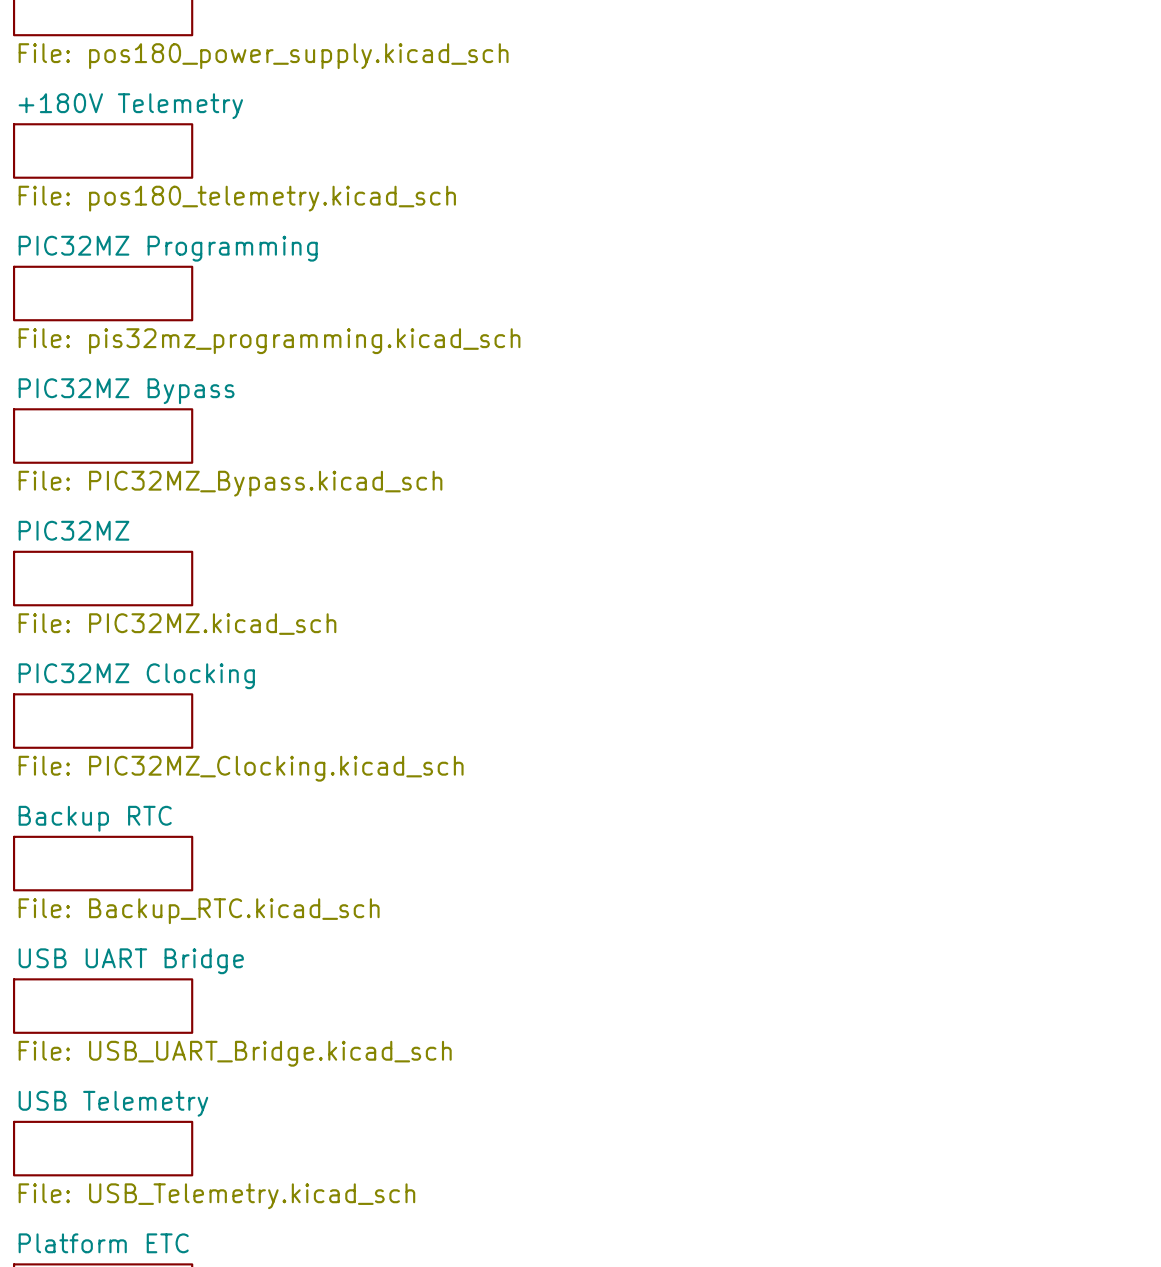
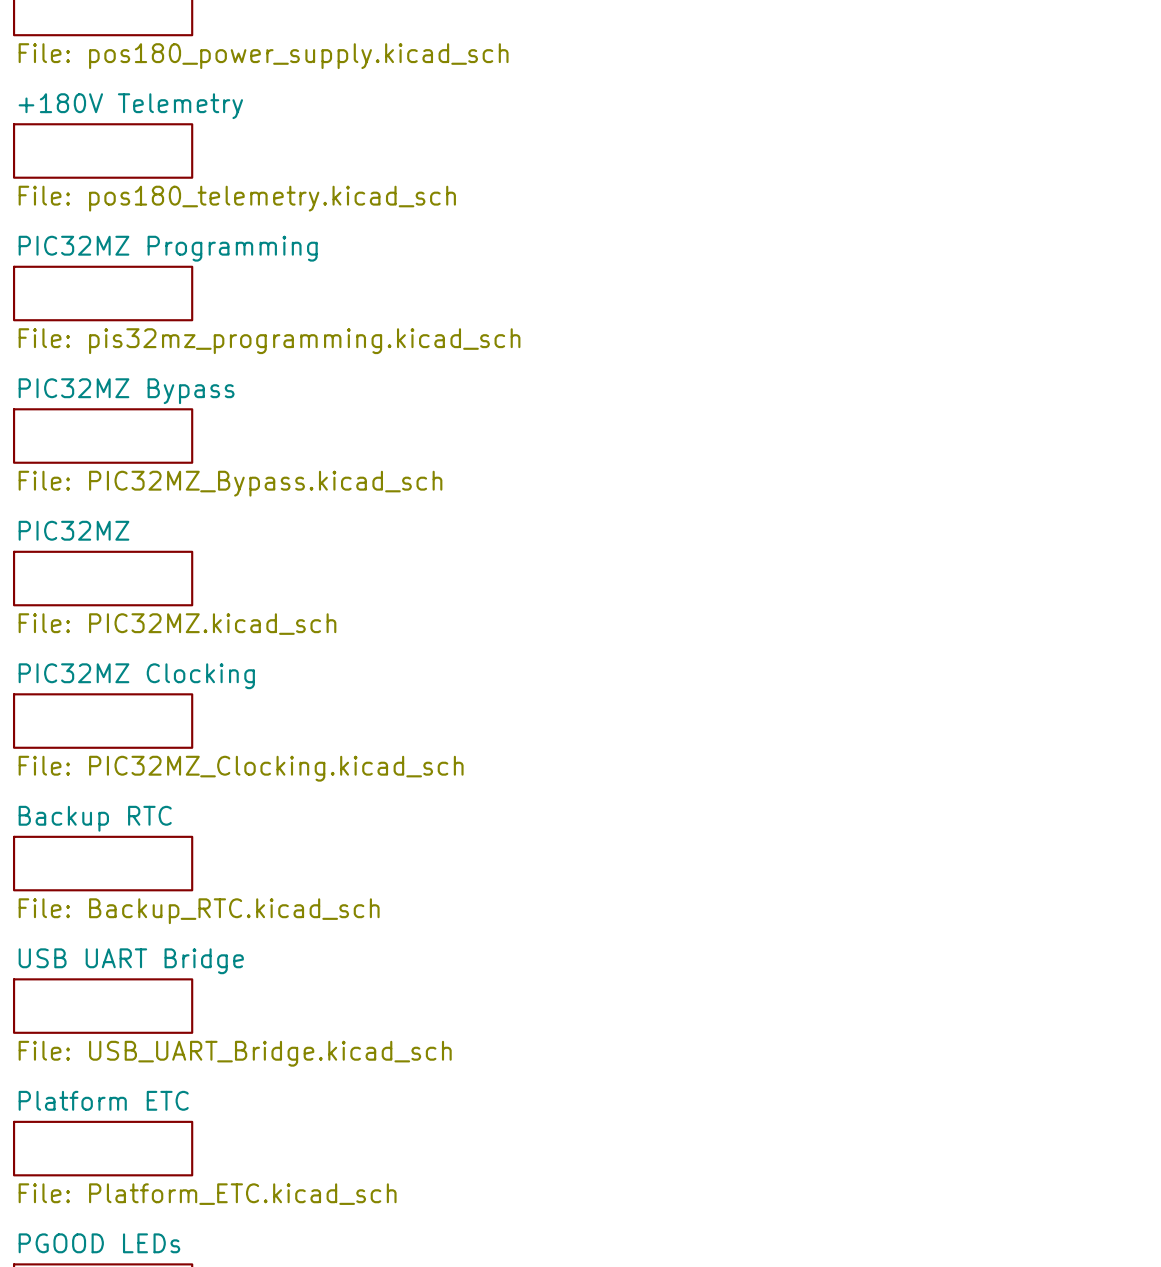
sheet USB Telemetry name: USB Telemetry (113, 1103) -> Platform ETC (103, 1100)
sheet USB Telemetry value: File: USB_Telemetry.kicad_sch (216, 1196) -> File: Platform_ETC.kicad_sch (207, 1194)
sheet Platform ETC name: Platform ETC (103, 1243) -> PGOOD LEDs (99, 1243)

